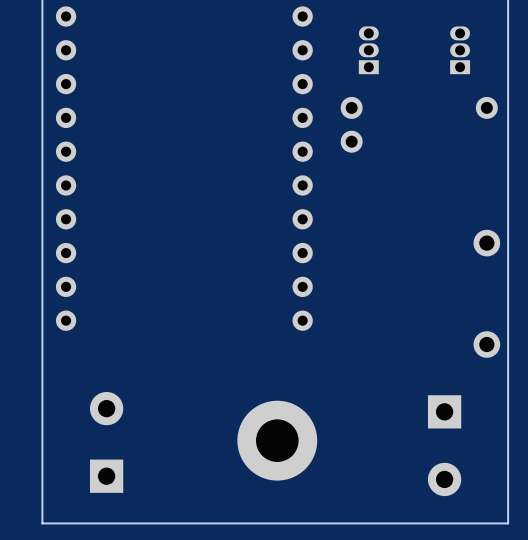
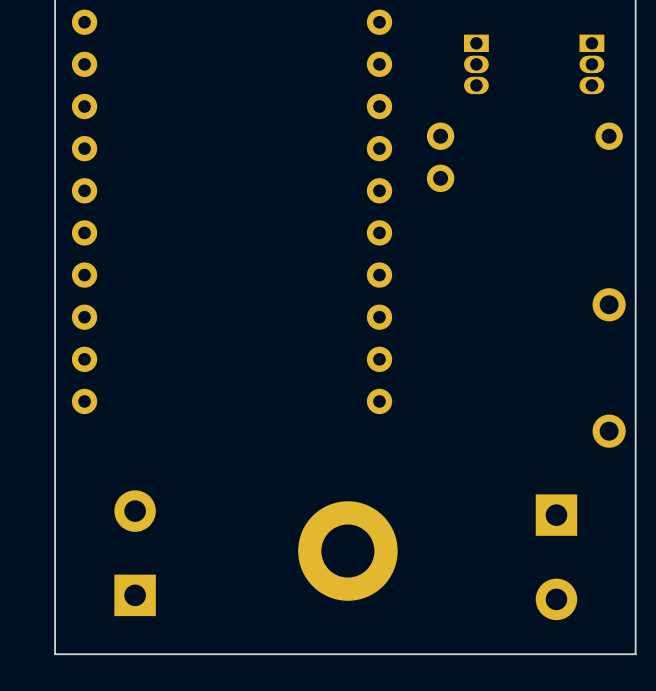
part rotation: 0° (368, 50) -> 180° (476, 64)
part rotation: 0° (460, 50) -> 180° (591, 64)

